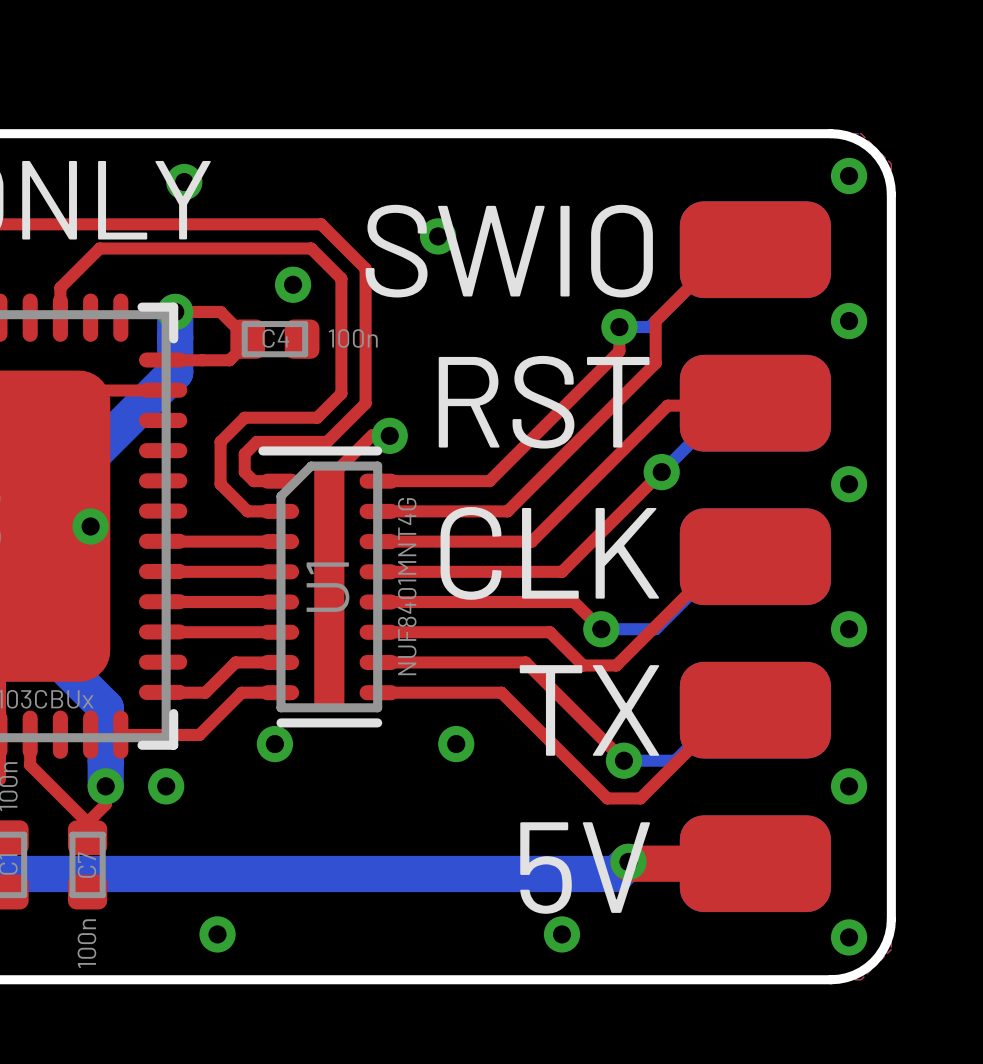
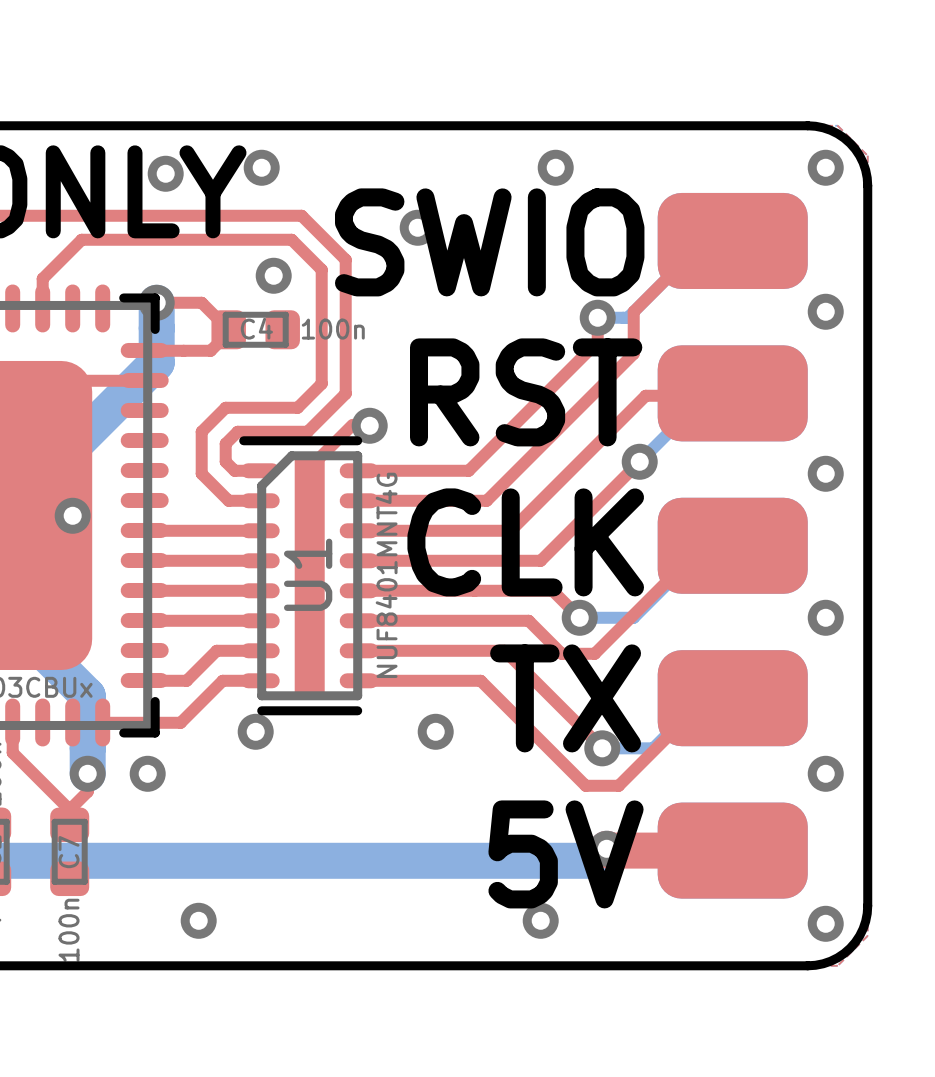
via: none -> (261, 167)
via: none -> (555, 167)

